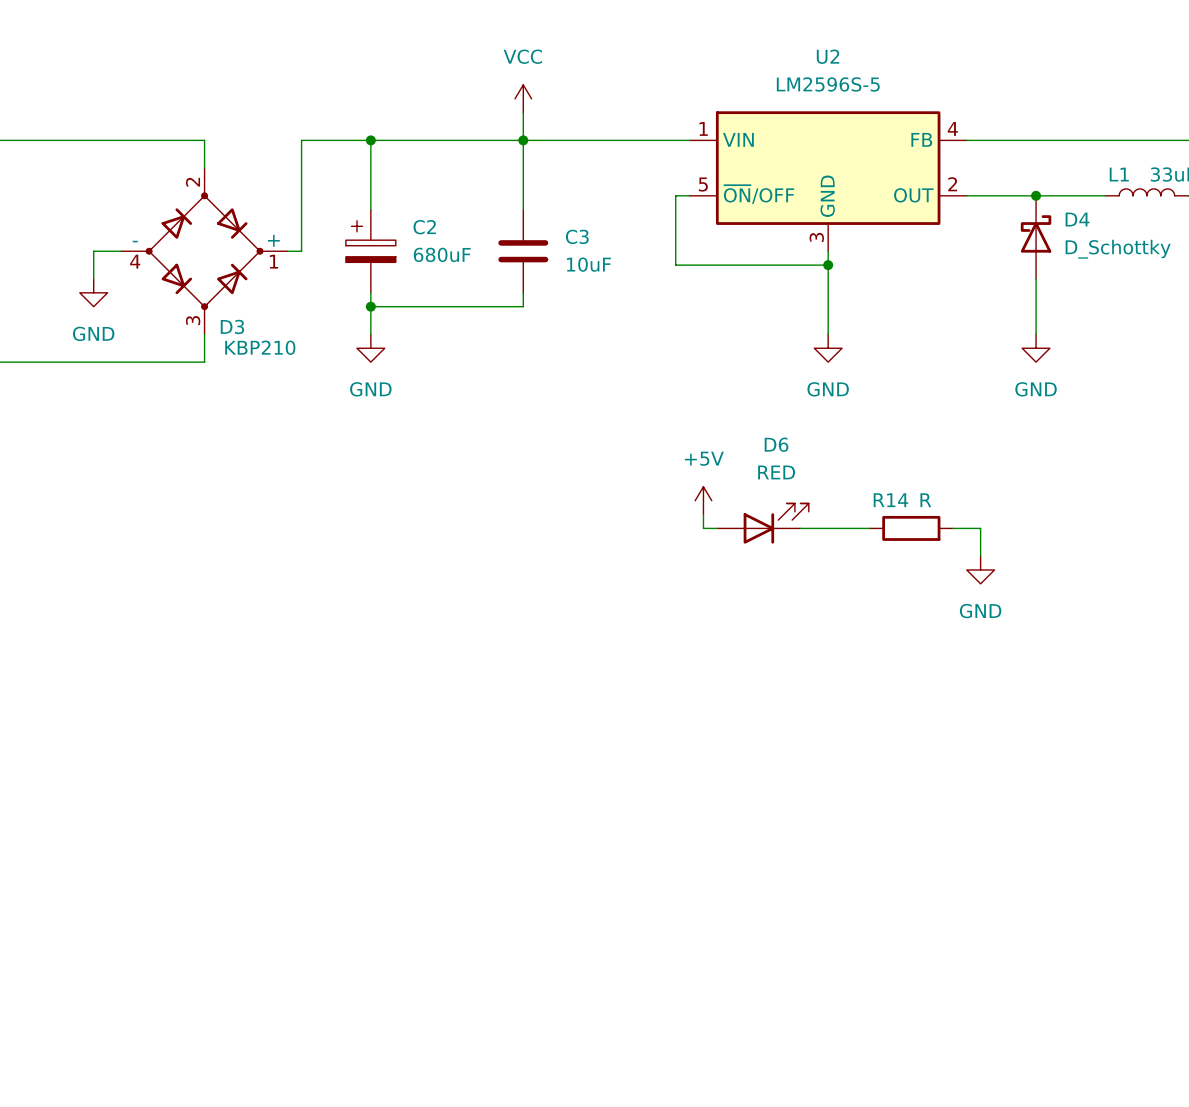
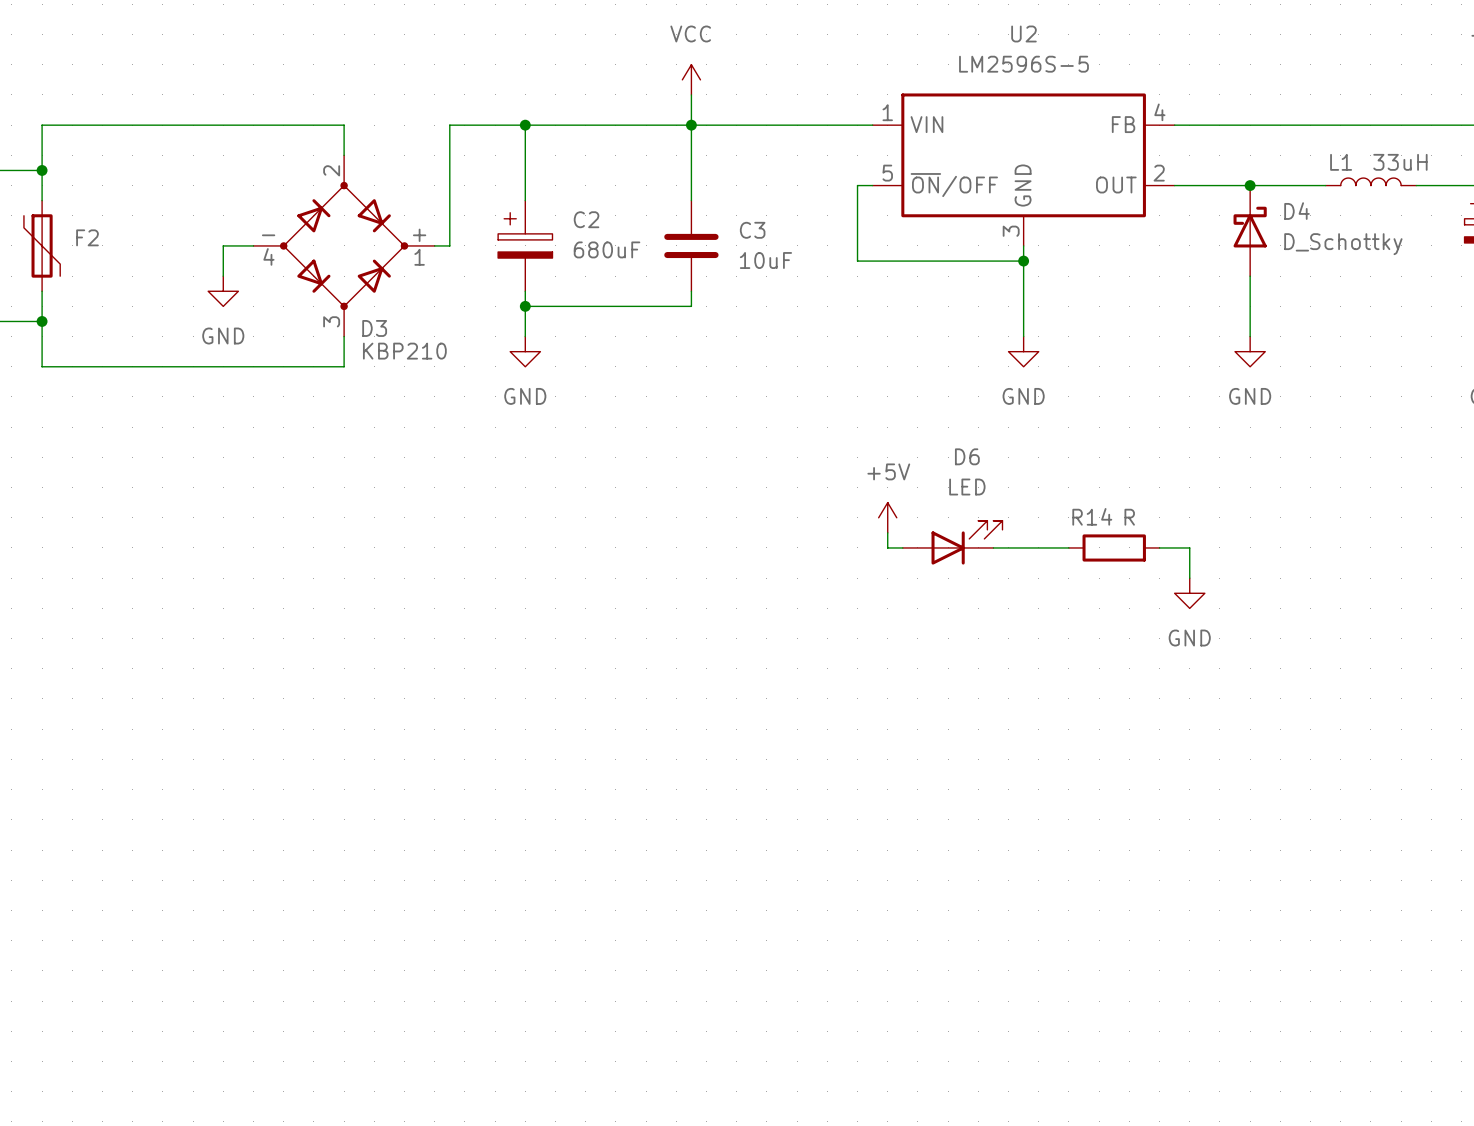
D6 value: RED (776, 472) -> LED (967, 487)

